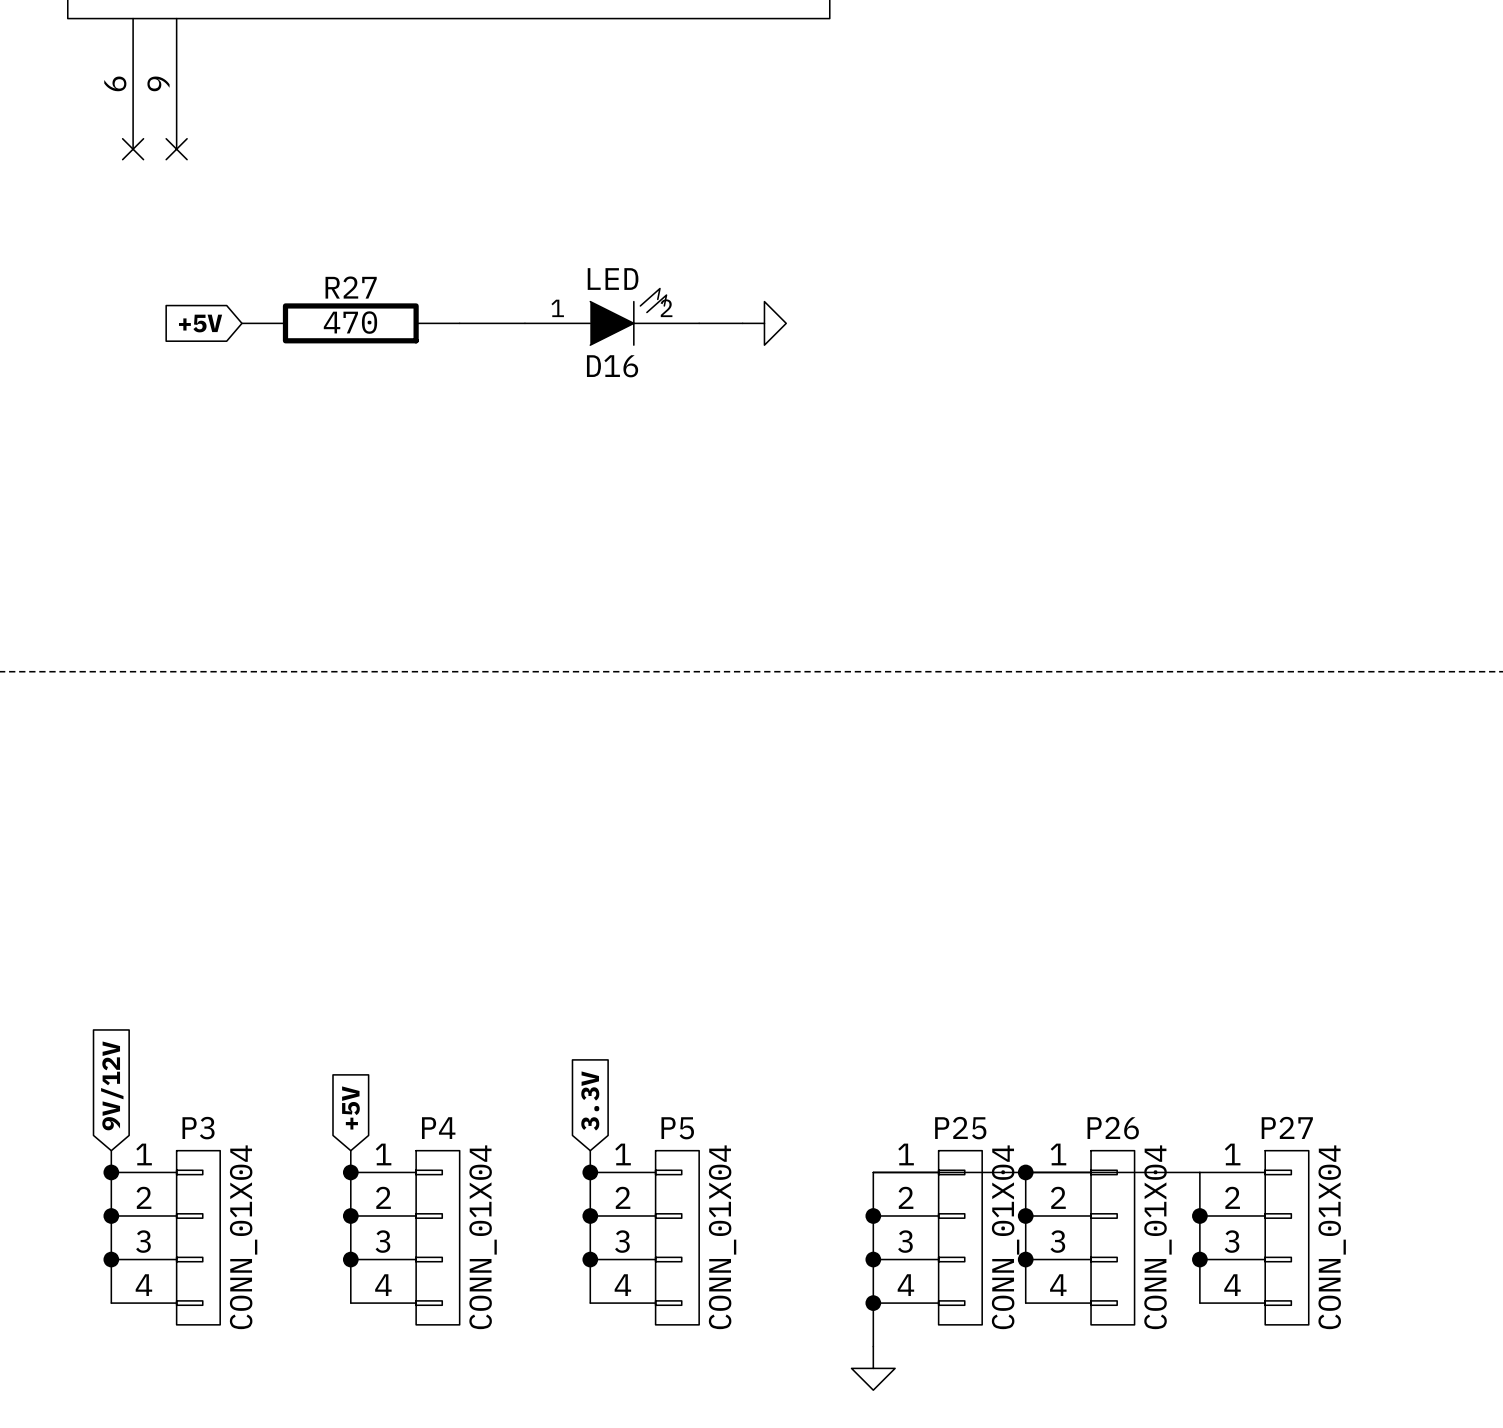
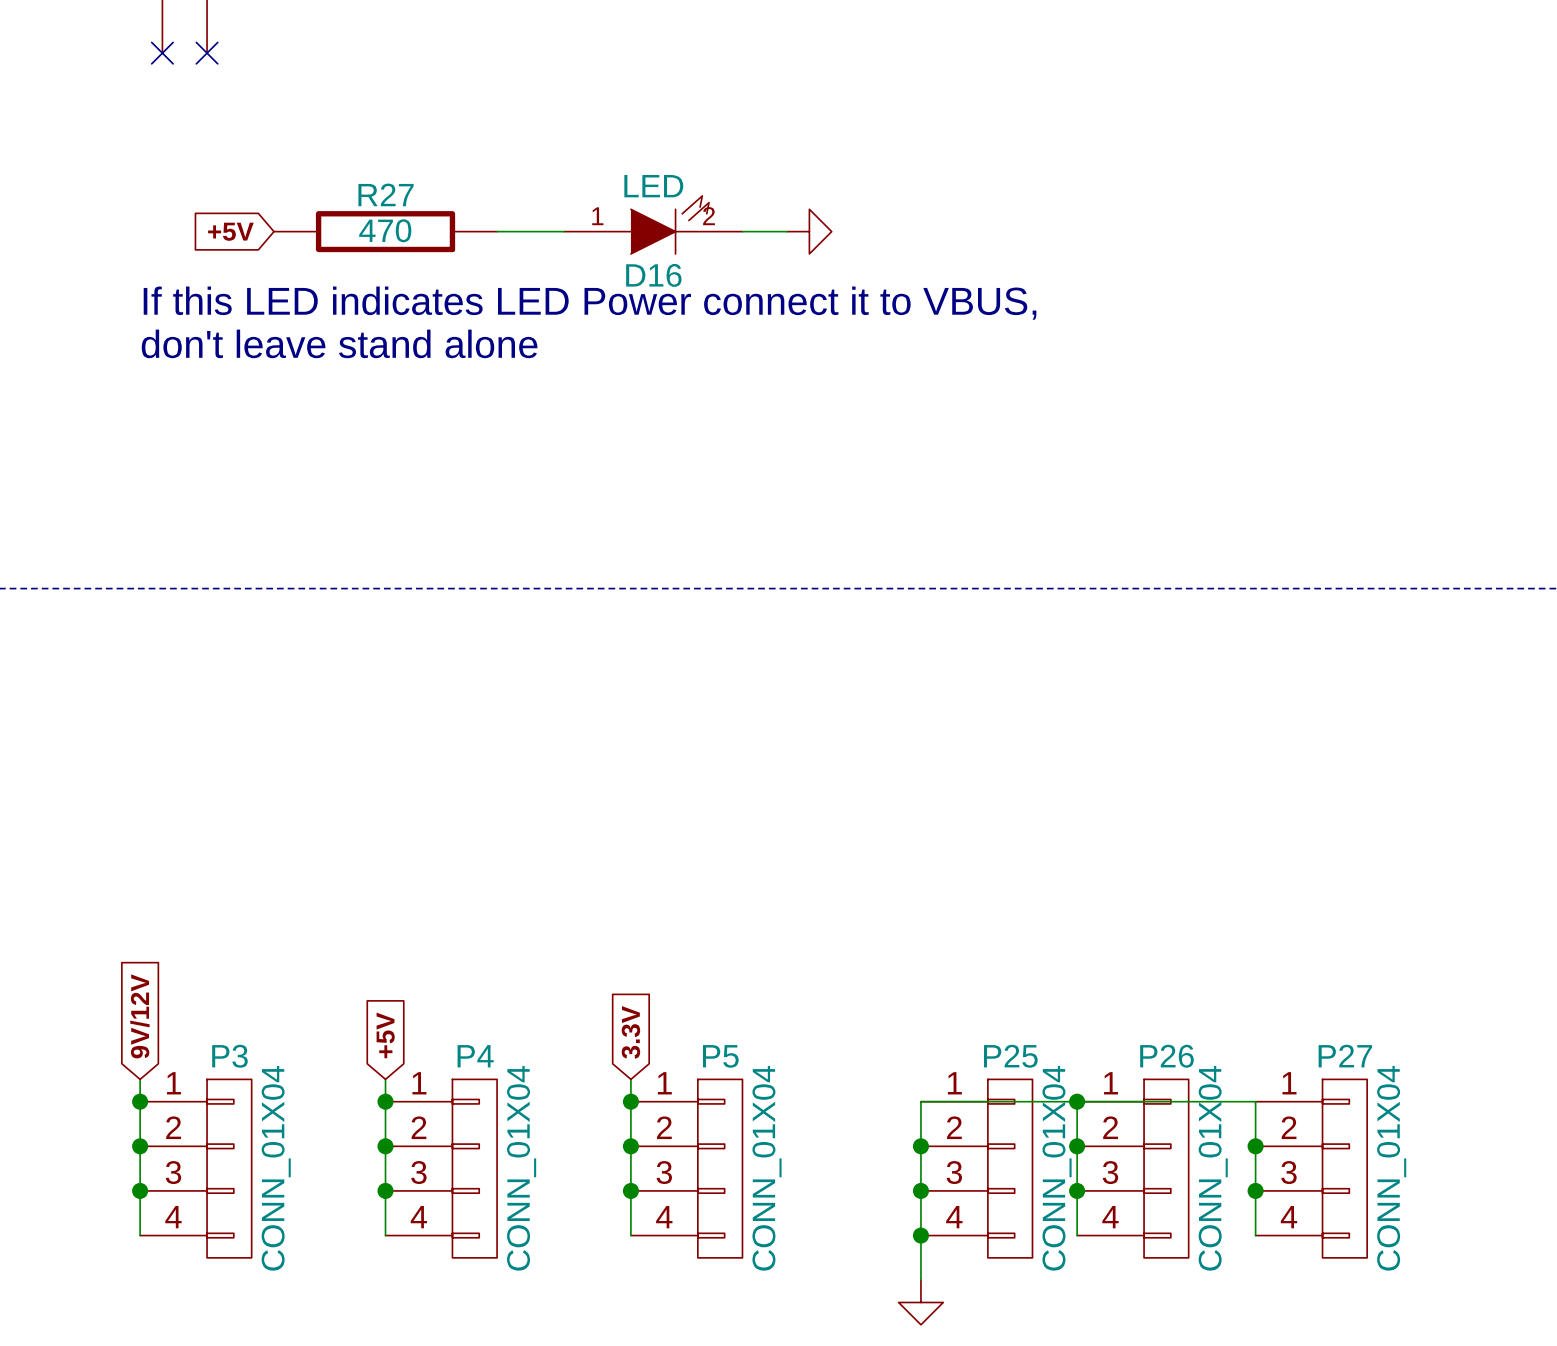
text: none -> If this LED indicates LED Power connect it to VBUS, (590, 303)
text: none -> don't leave stand alone (339, 343)

